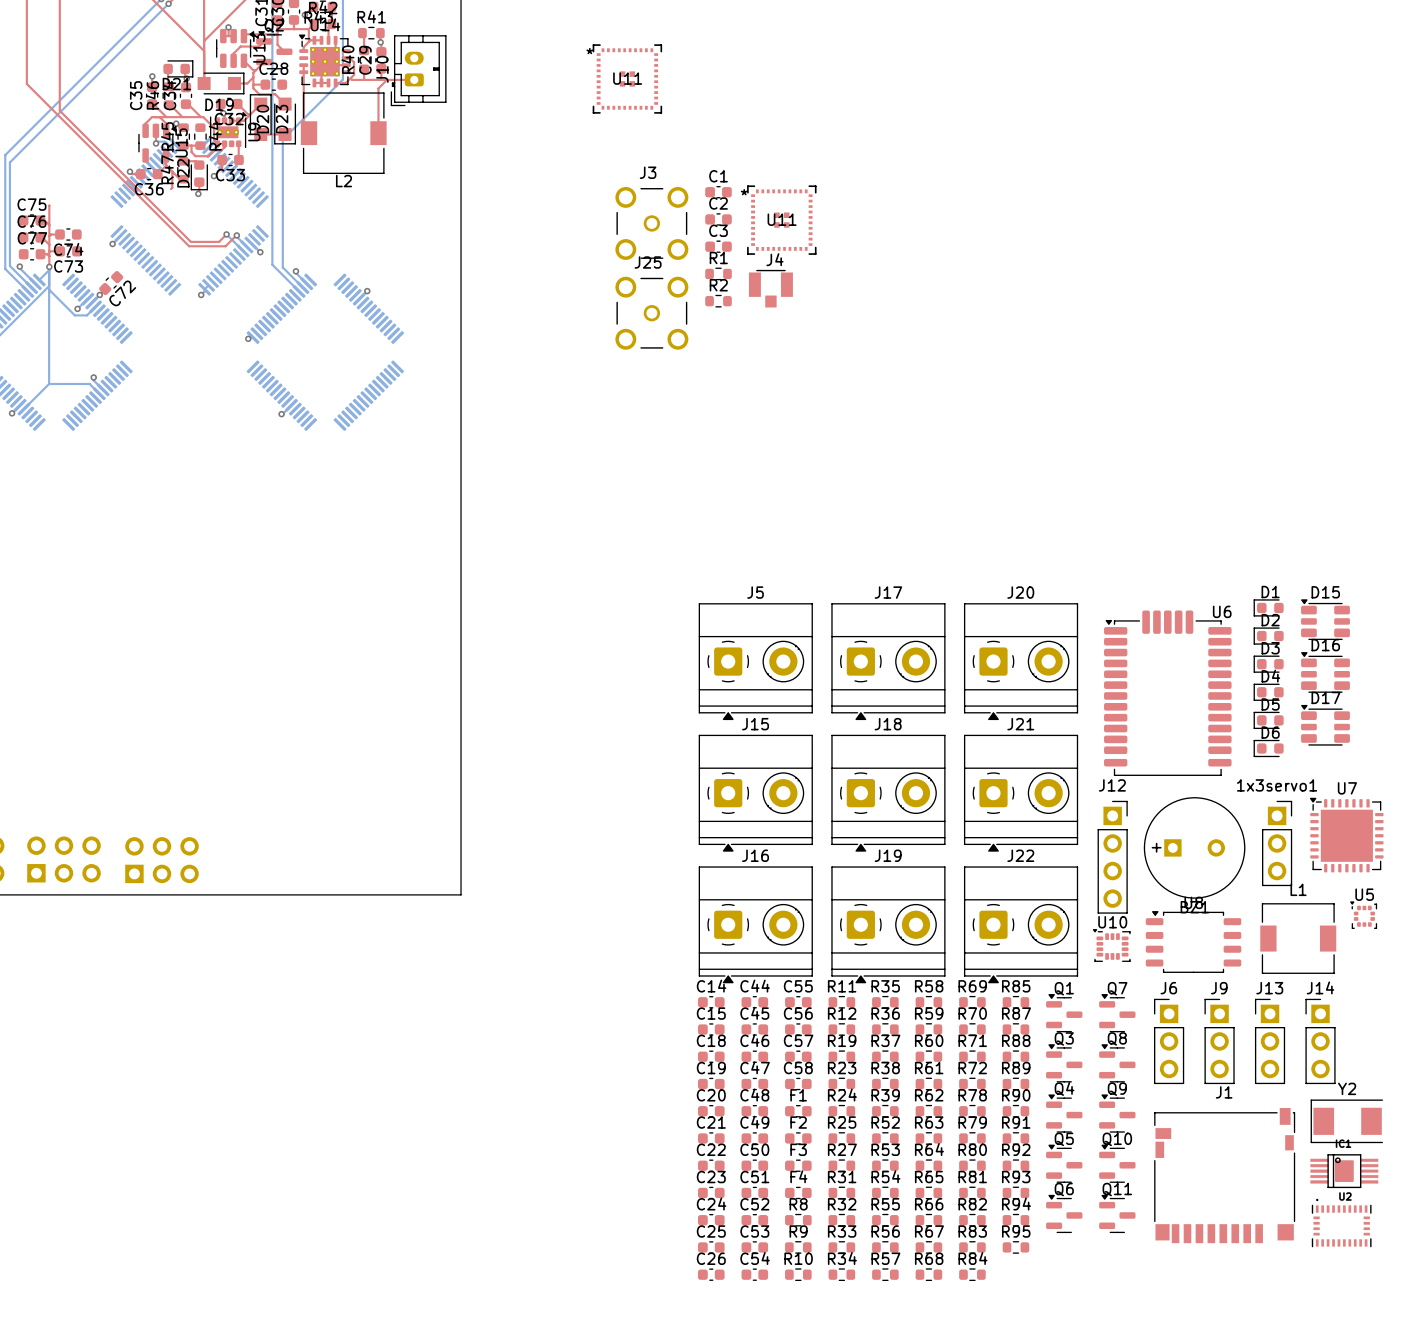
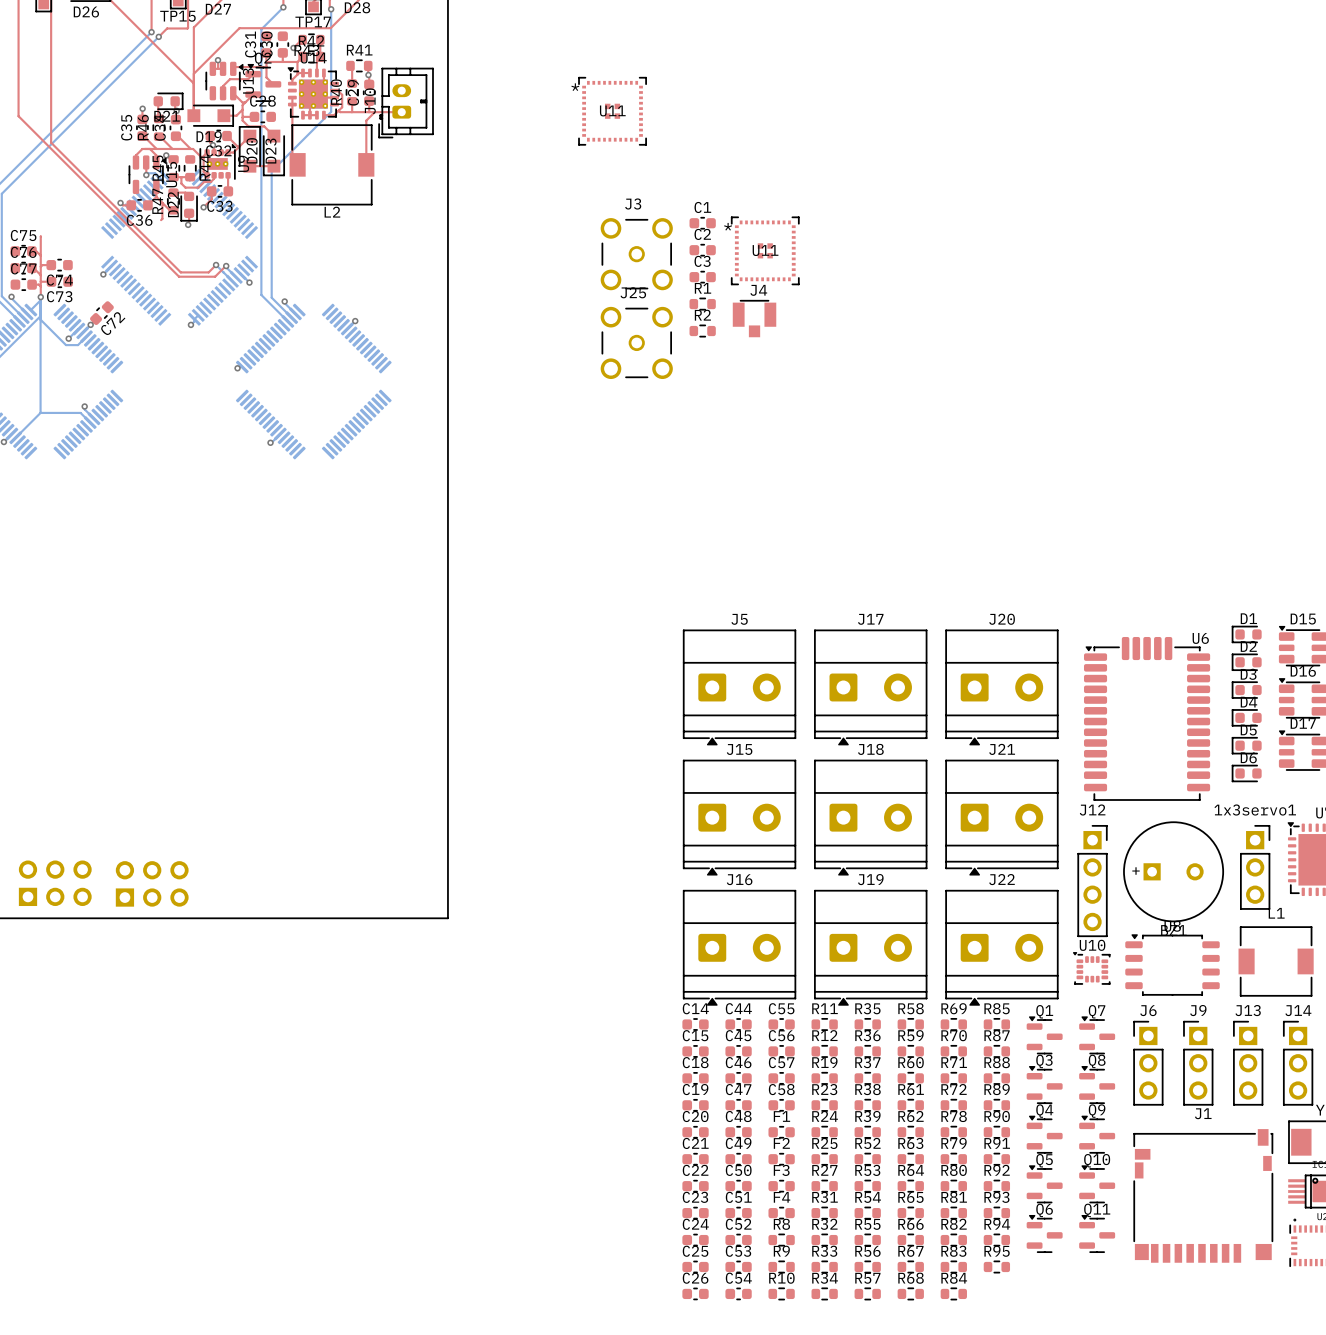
J5 footprint: [698, 603, 813, 721] -> [683, 629, 797, 746]
J17 footprint: [831, 603, 946, 721] -> [814, 629, 928, 746]
J20 footprint: [963, 603, 1079, 721] -> [945, 629, 1059, 746]
J15 footprint: [698, 734, 813, 852] -> [683, 759, 797, 876]
J18 footprint: [831, 734, 946, 852] -> [814, 759, 928, 876]
J21 footprint: [963, 734, 1079, 852] -> [945, 759, 1059, 876]
J16 footprint: [698, 866, 813, 984] -> [683, 890, 797, 1006]
J19 footprint: [831, 866, 946, 984] -> [814, 890, 928, 1006]
J22 footprint: [963, 866, 1079, 984] -> [945, 890, 1059, 1006]

